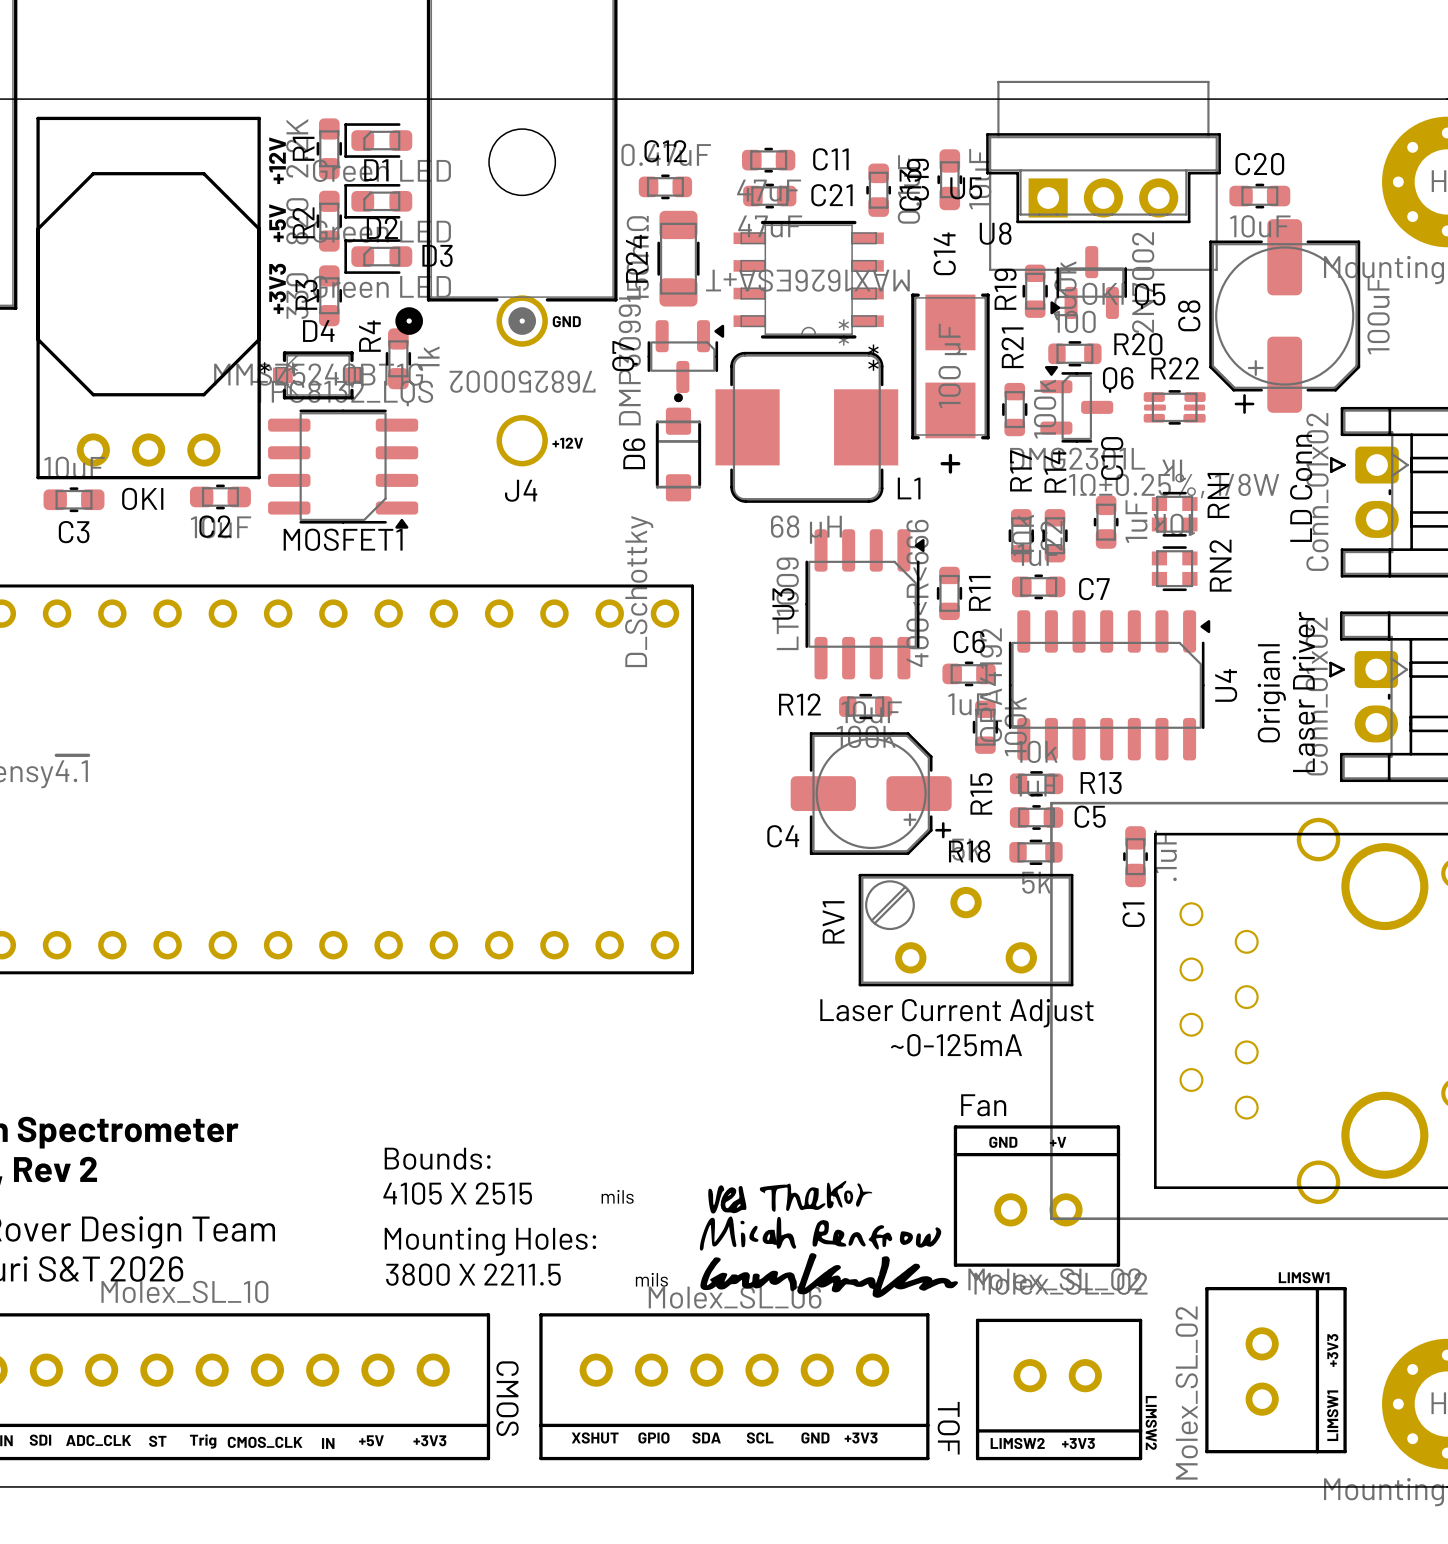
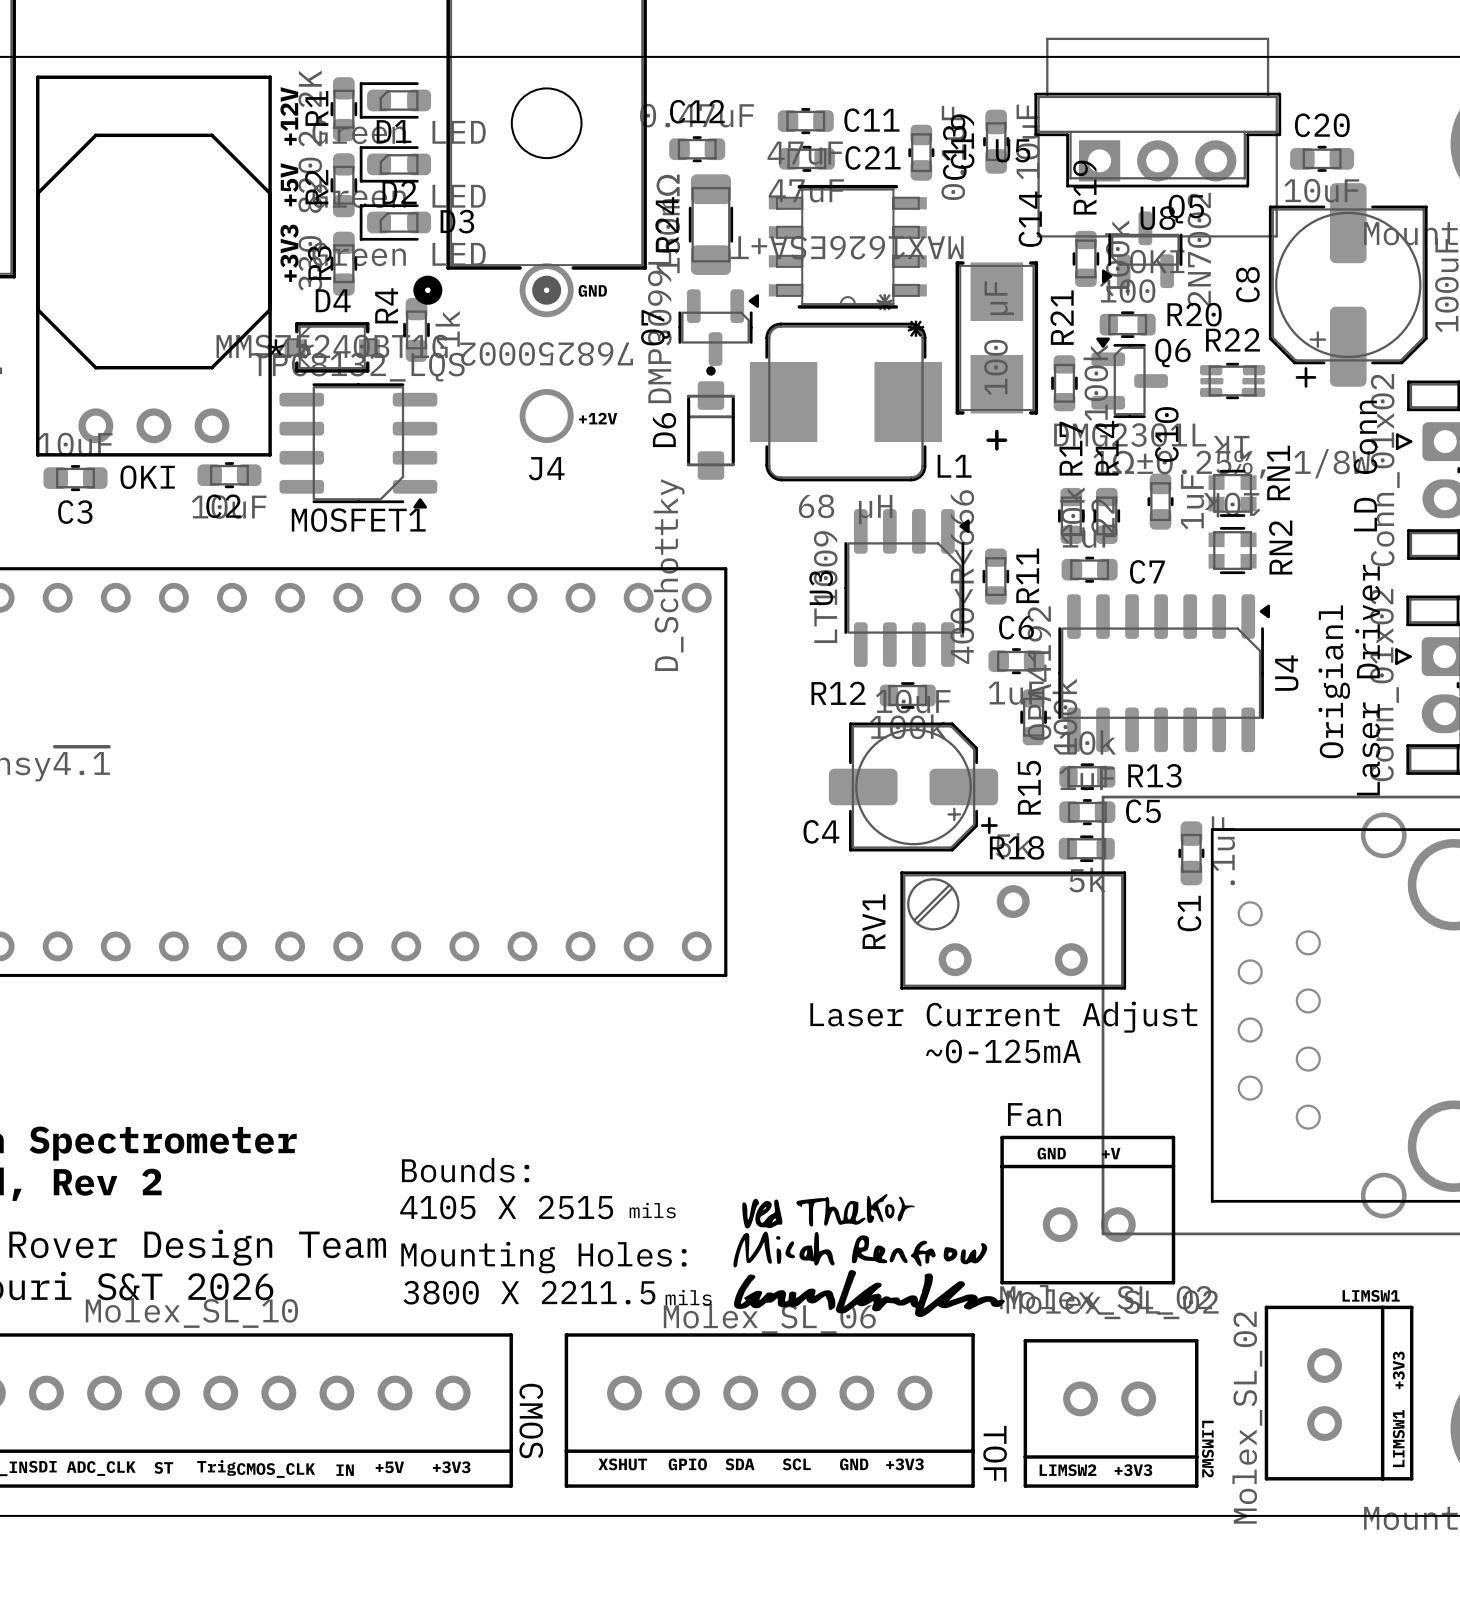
U8 name position: U8 (995, 233) -> U8 (1158, 218)
C14 name position: C14 (944, 253) -> C14 (1030, 219)
R19 name position: R19 (1005, 289) -> R19 (1084, 187)
Q5 name position: Q5 (1150, 296) -> Q5 (1186, 209)

